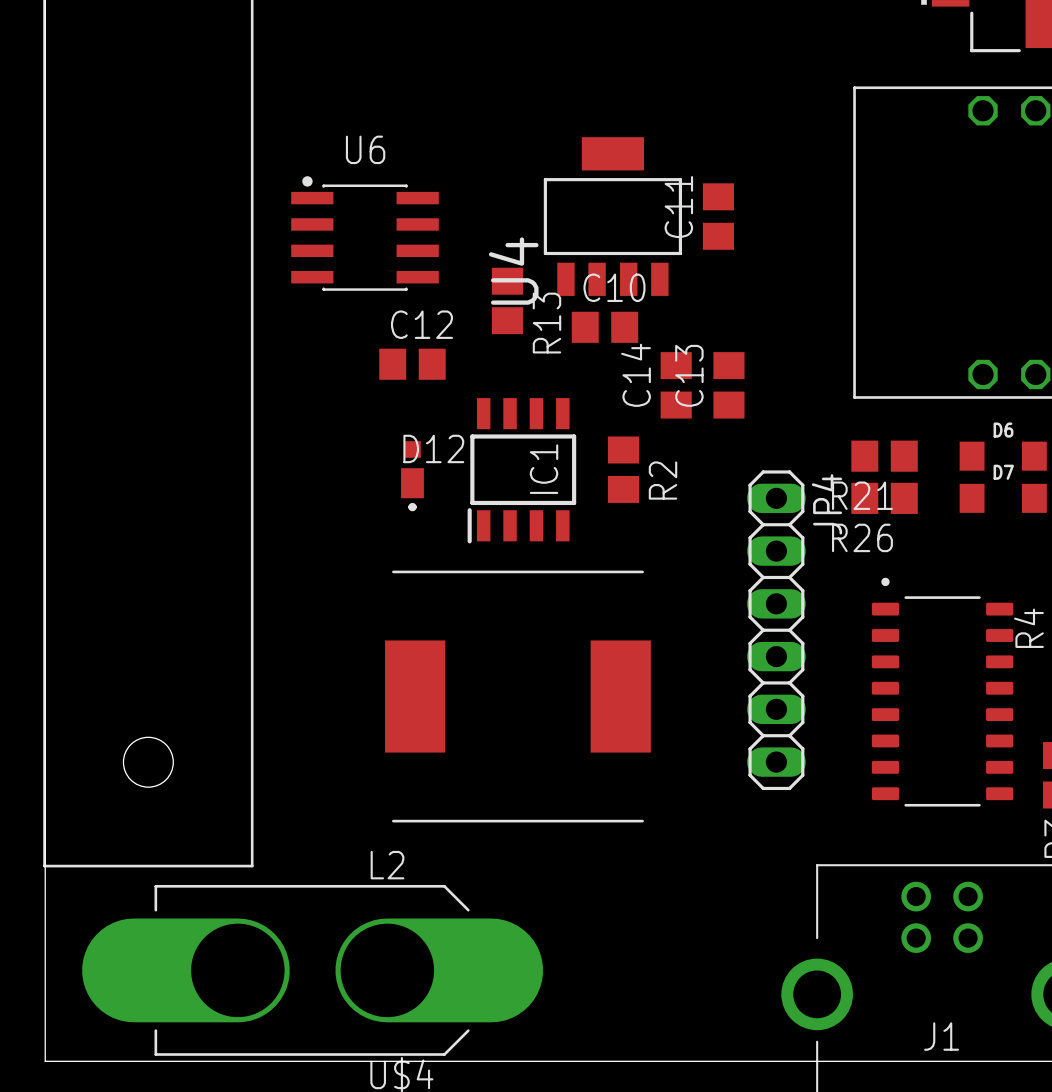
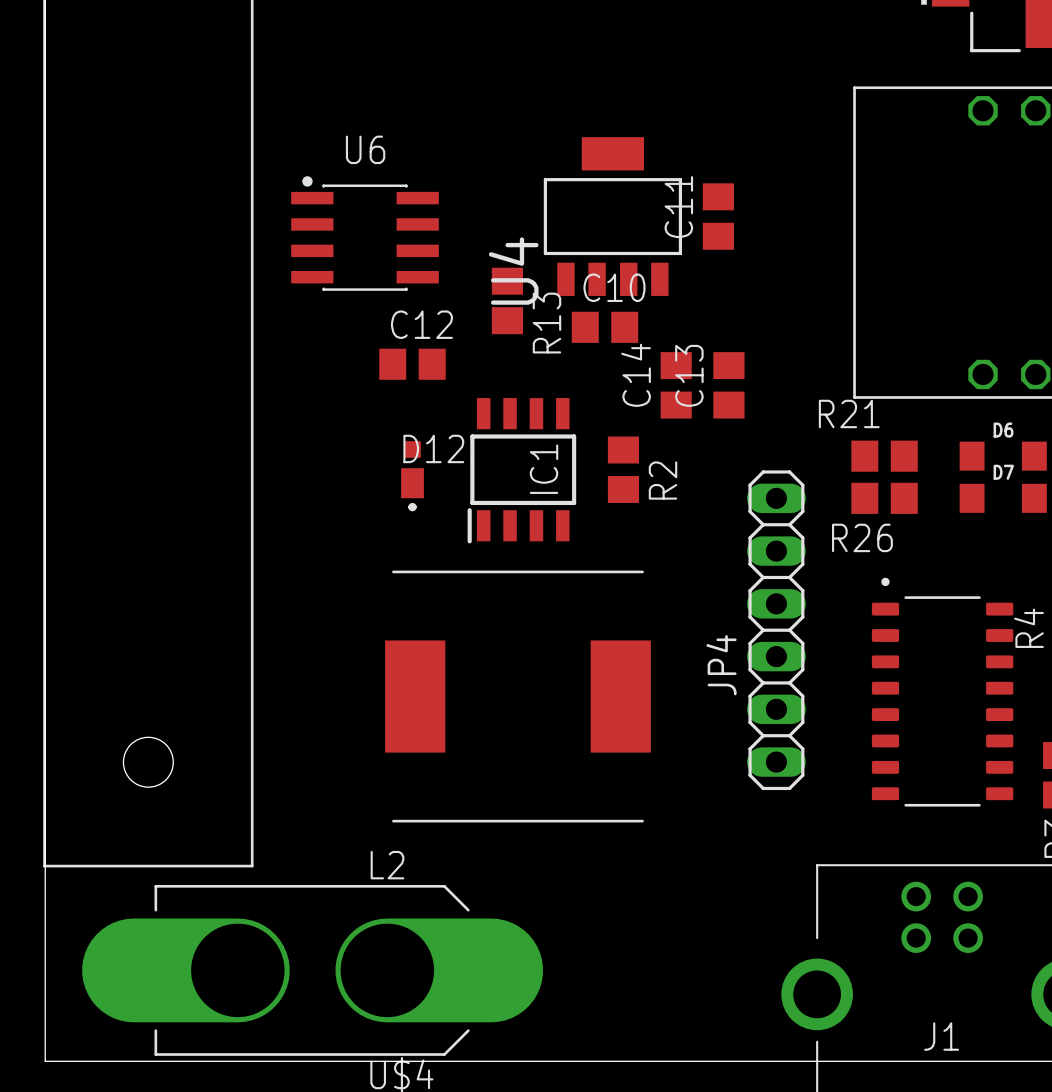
R21 name position: R21 (862, 495) -> R21 (849, 413)
JP4 name position: JP4 (826, 504) -> JP4 (721, 665)

